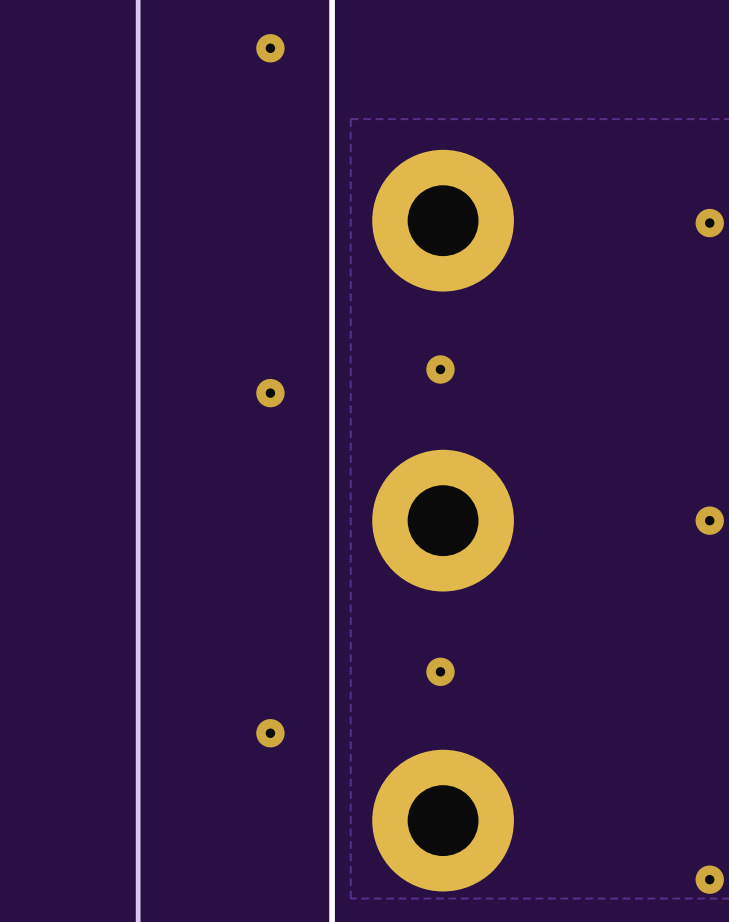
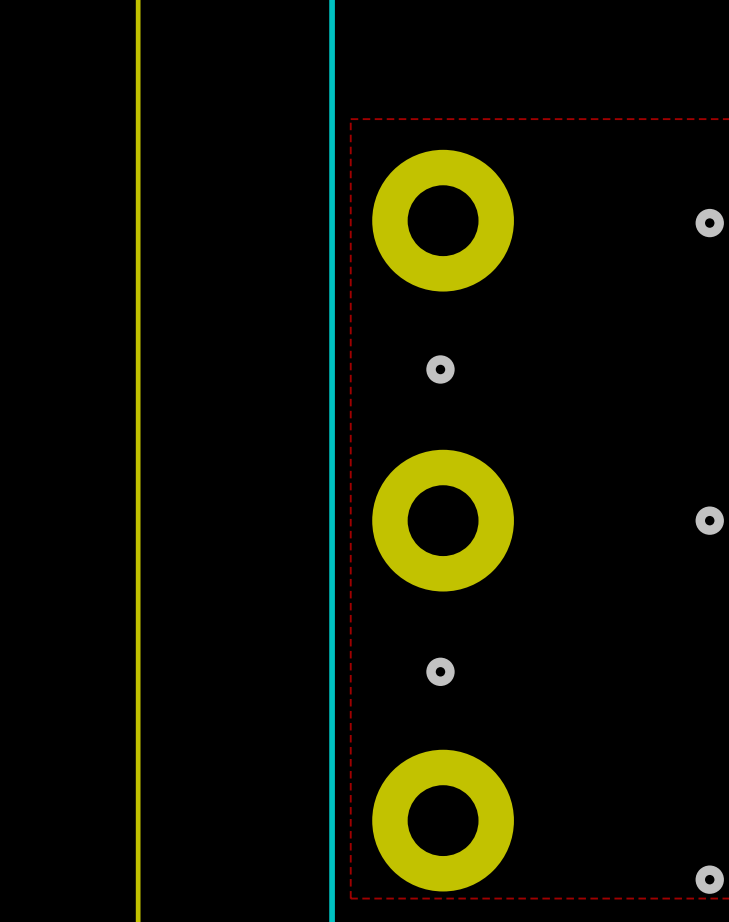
via: (270, 48) -> none
via: (270, 393) -> none
via: (270, 733) -> none

